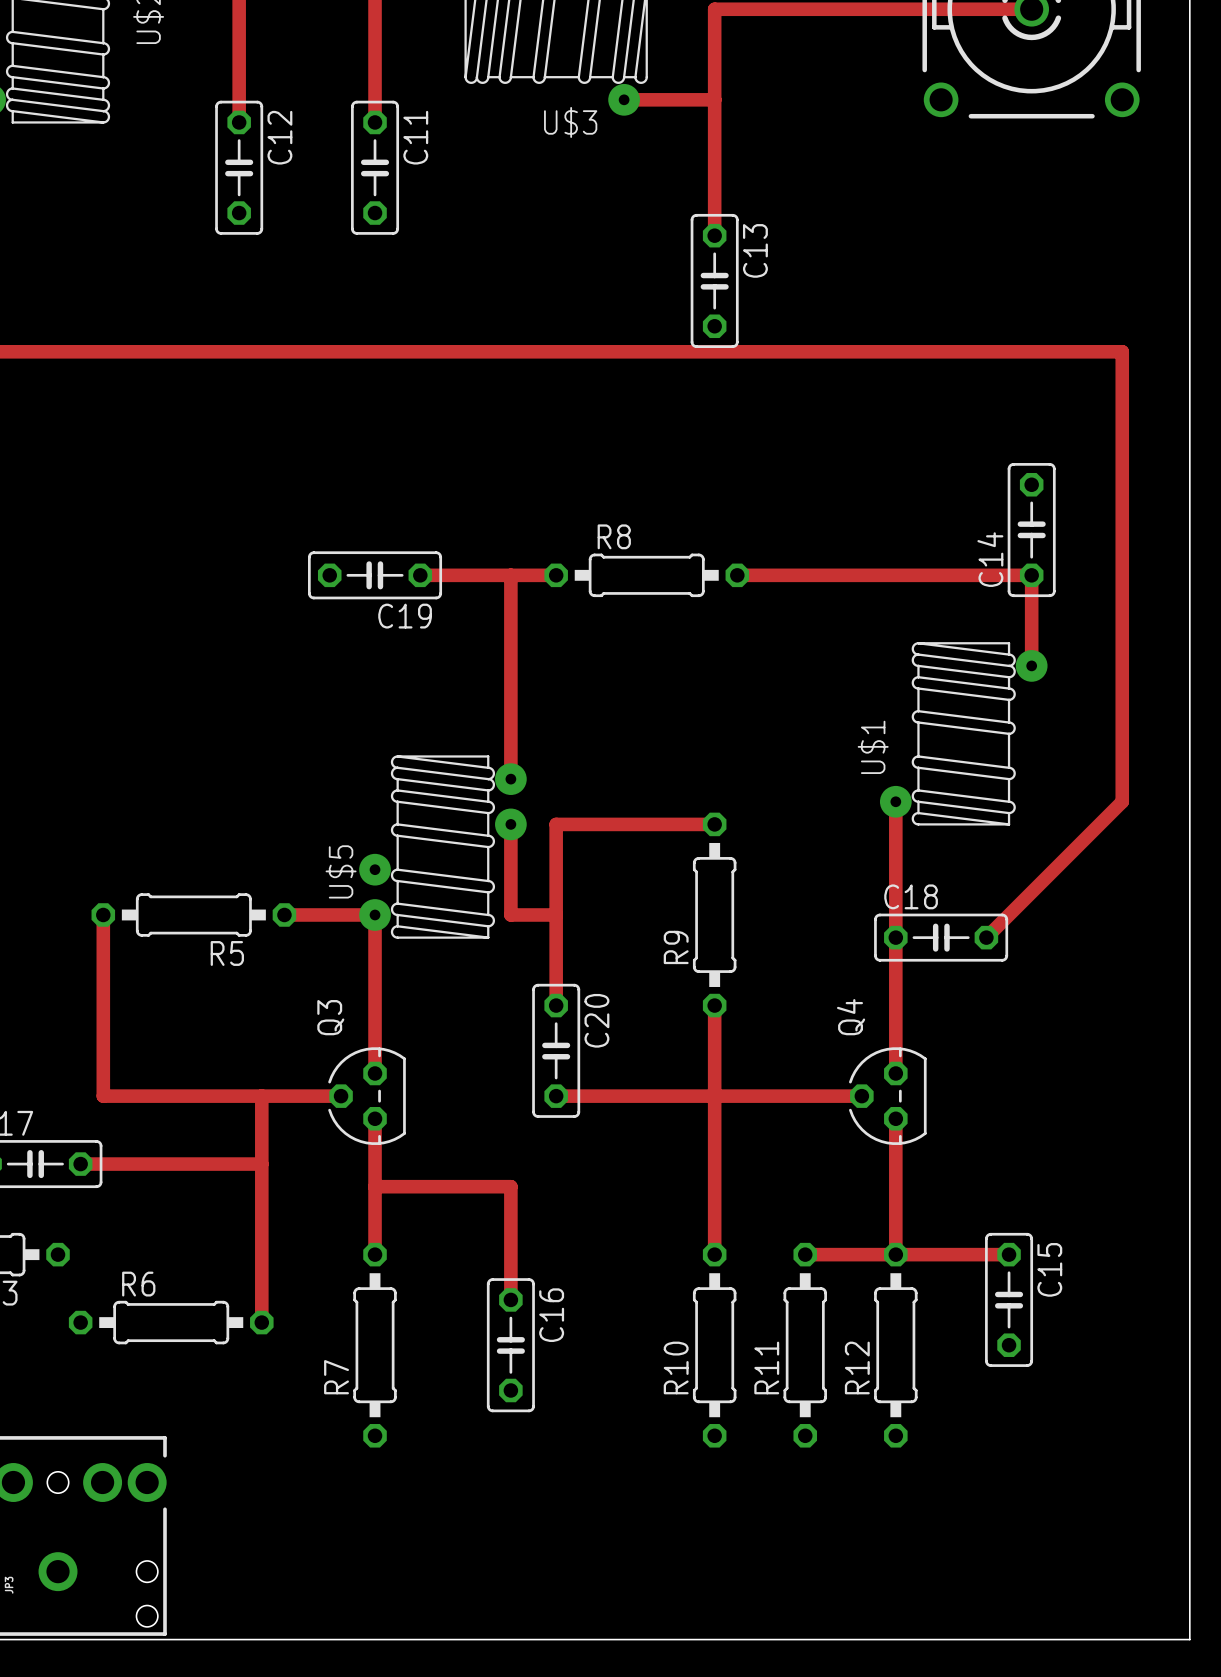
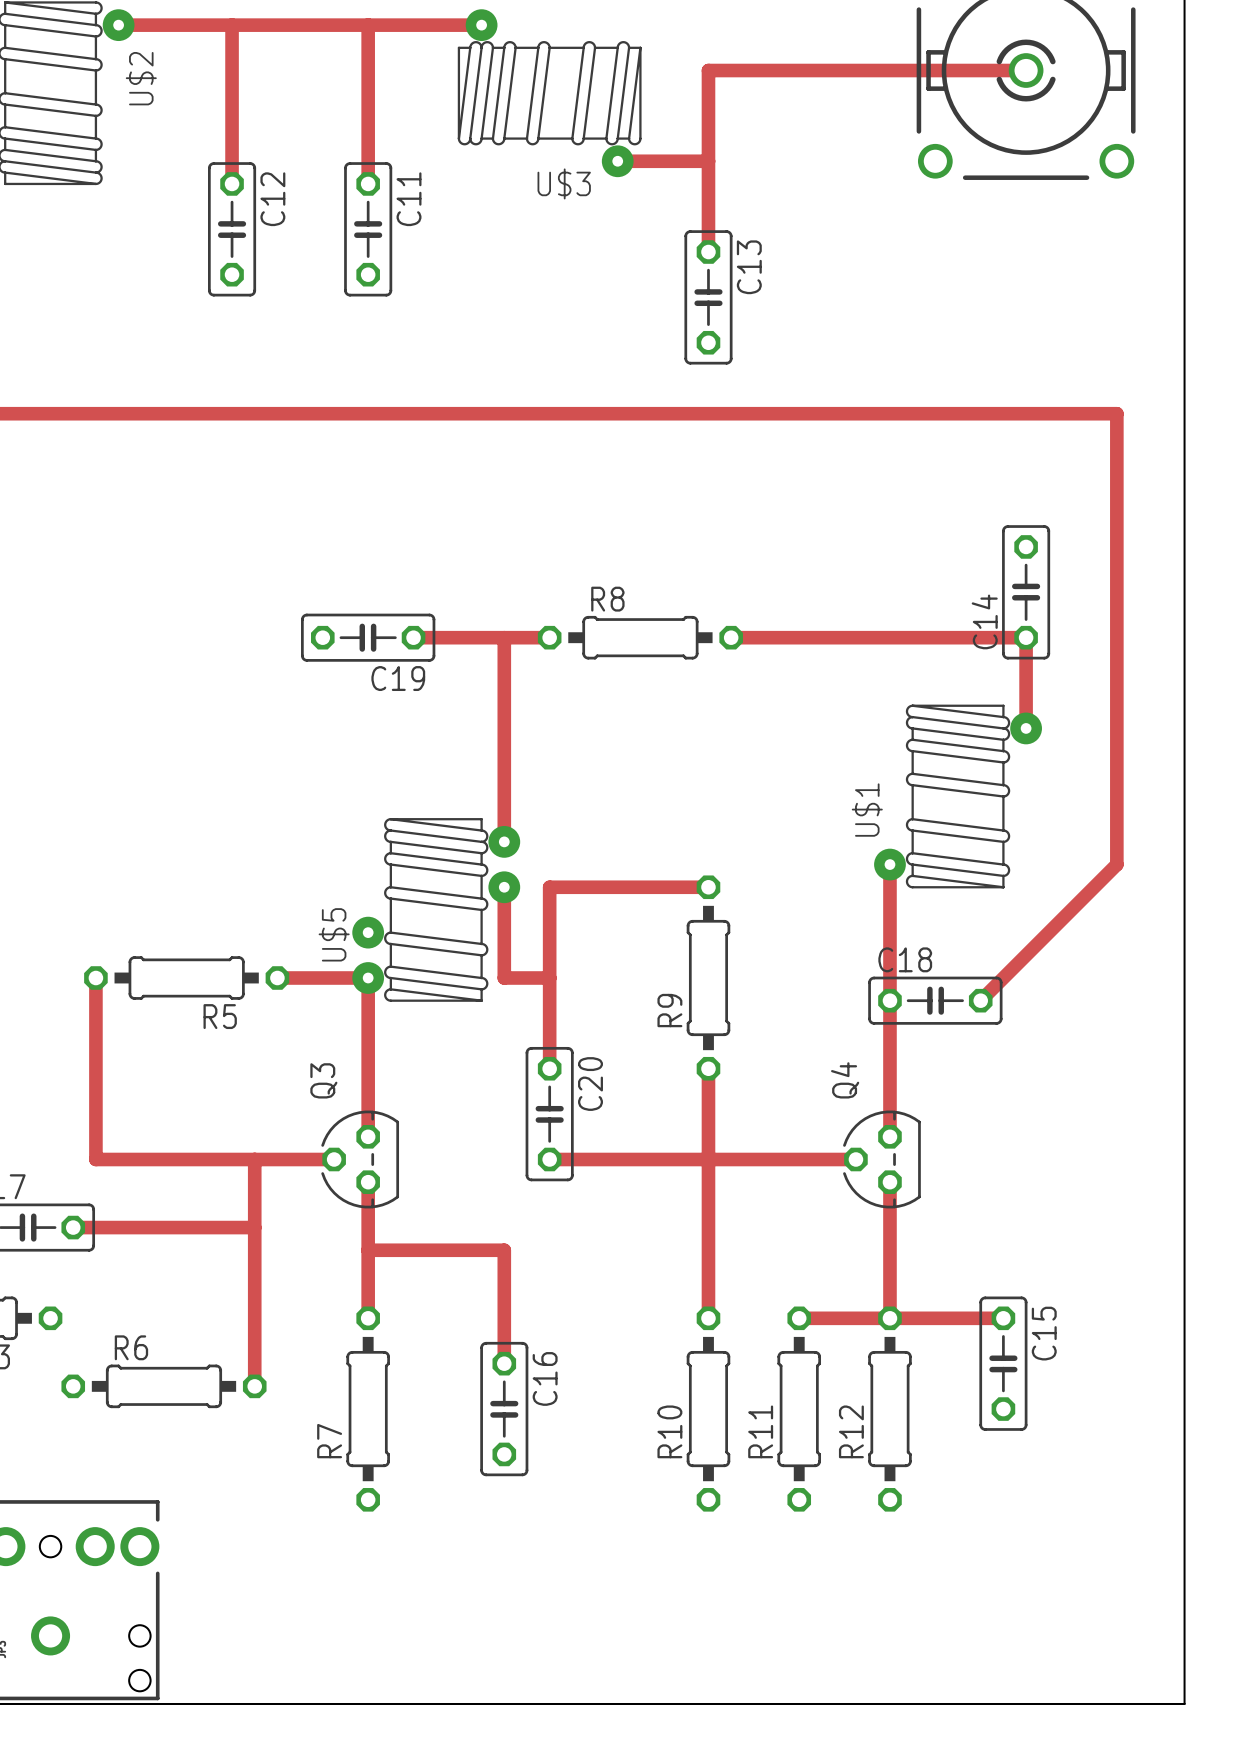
track: (714, 190) (714, 235) -> none
C13 position: (714, 280) -> (708, 297)

